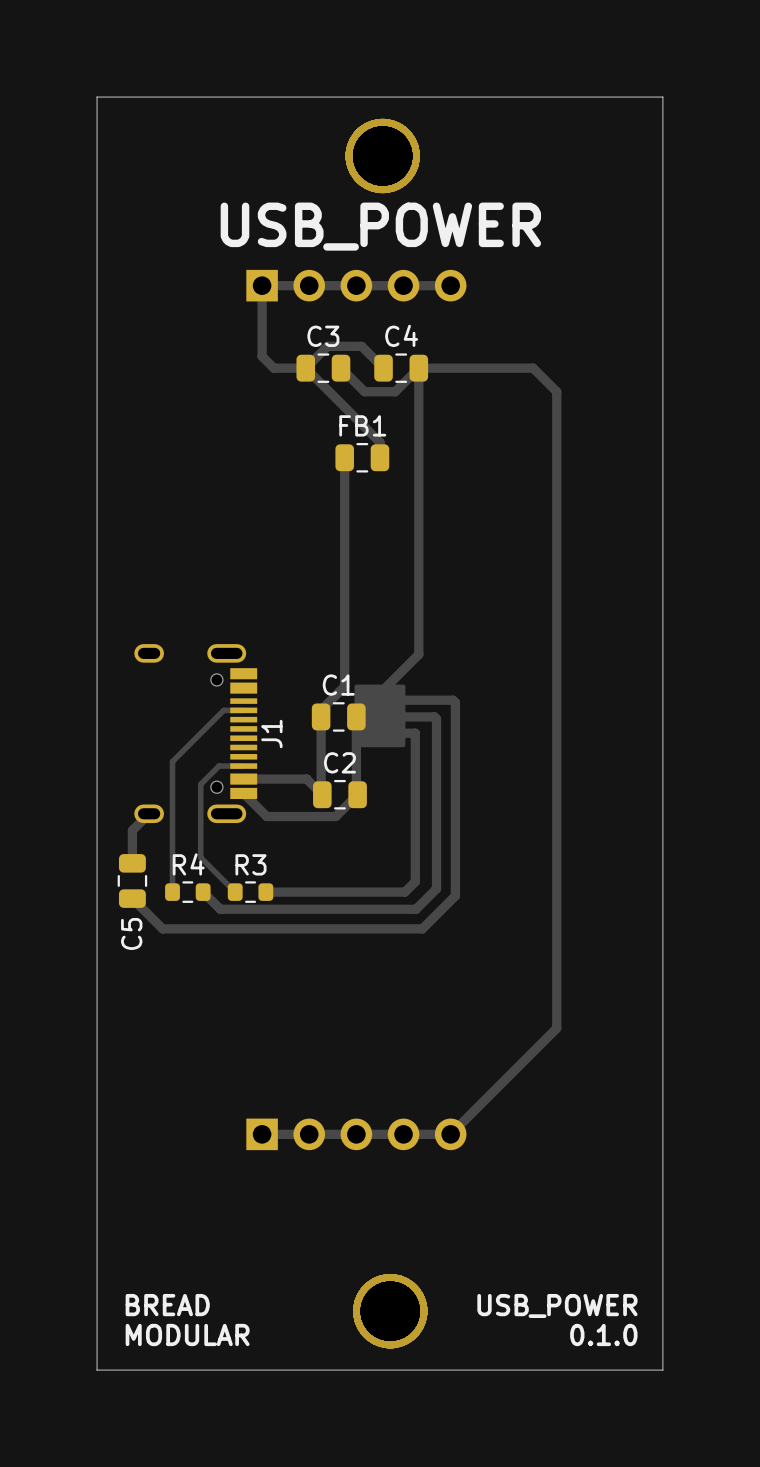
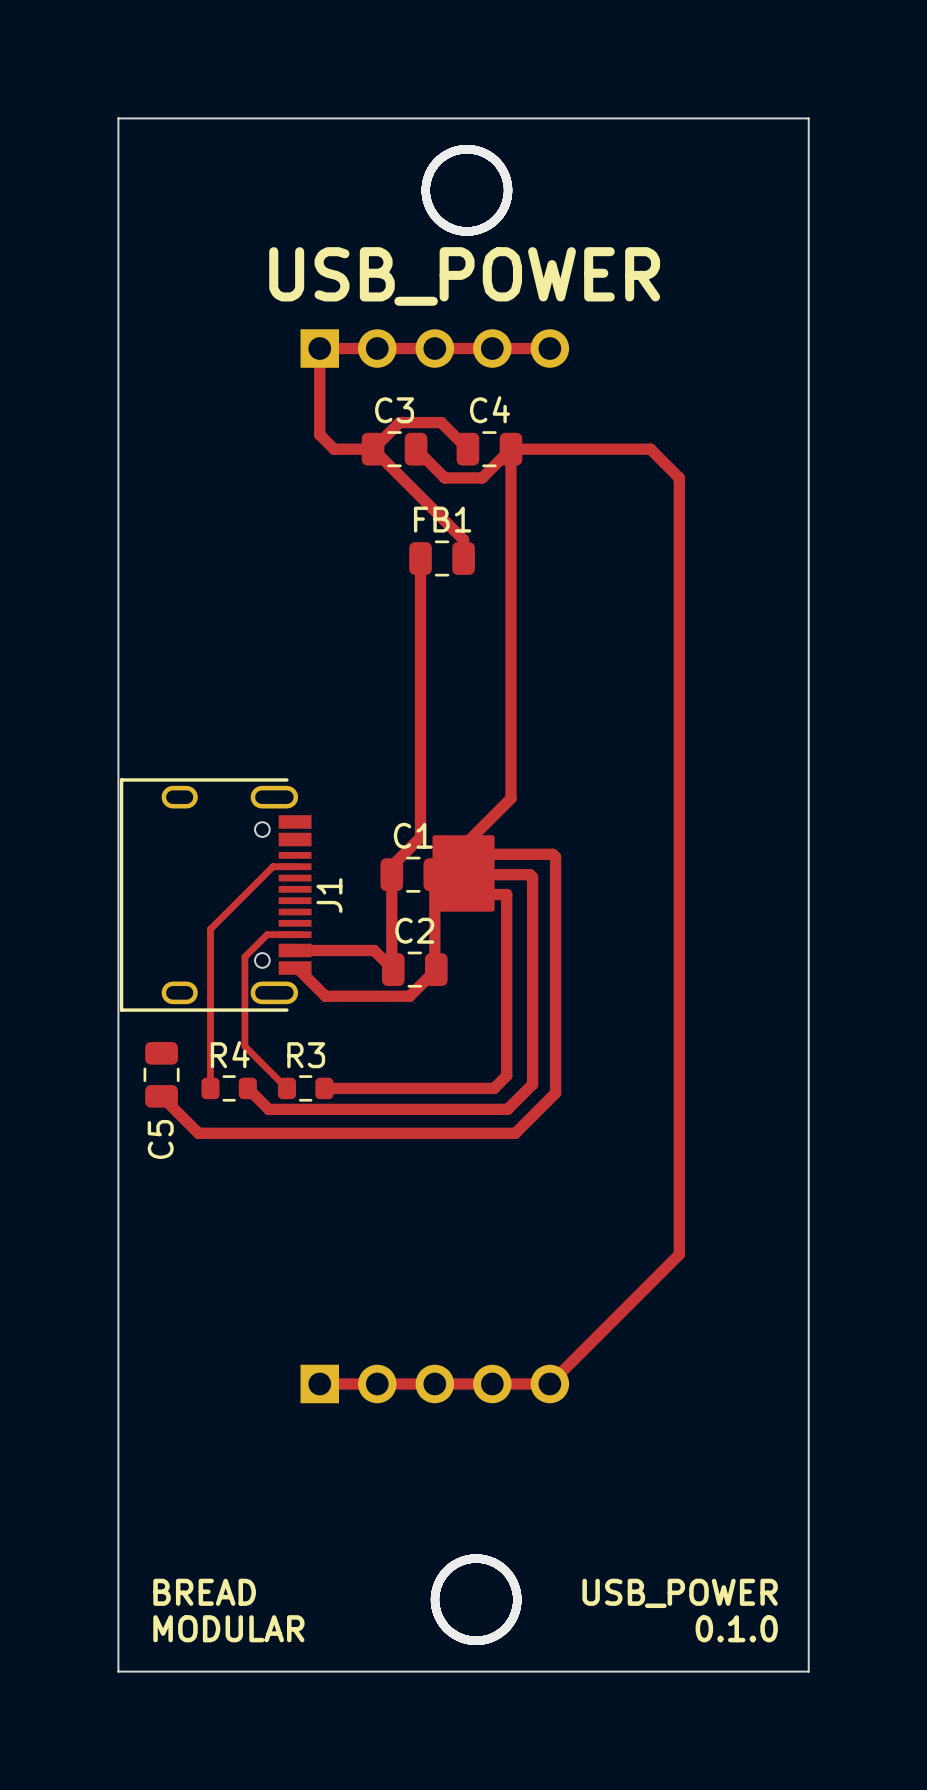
J1 footprint: [134, 644, 258, 824] -> [119, 778, 312, 1012]
track: (149, 813) (132, 830) (132, 863) -> none

